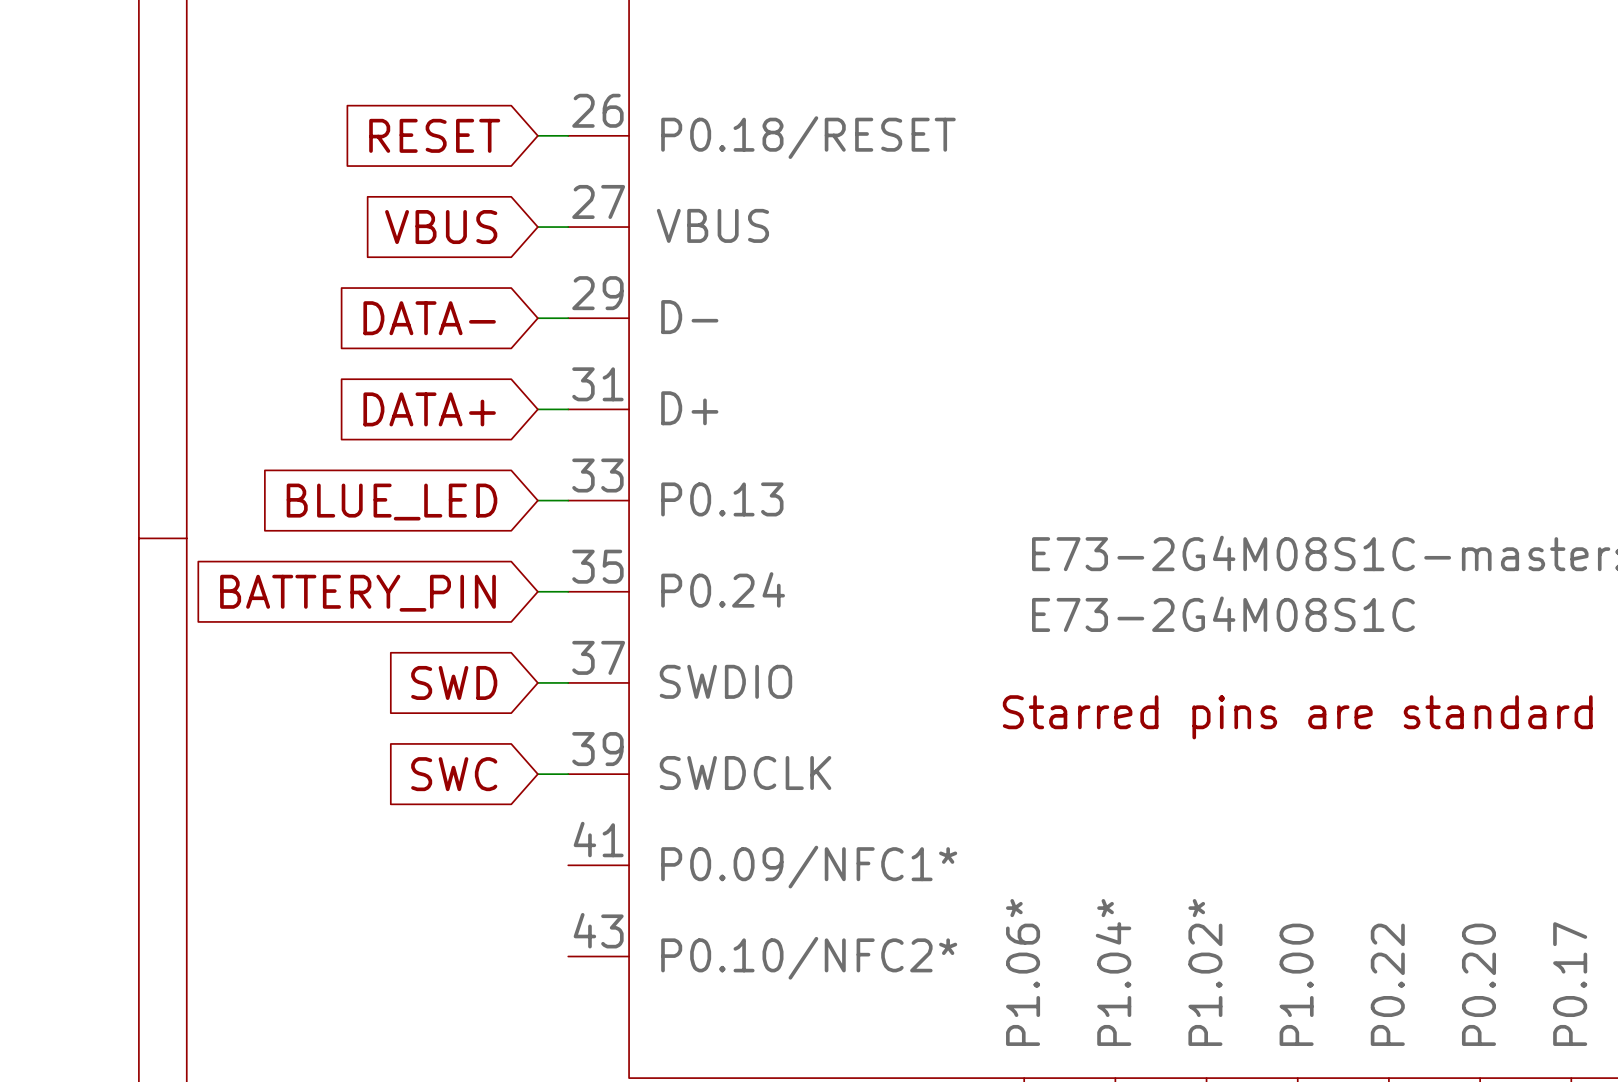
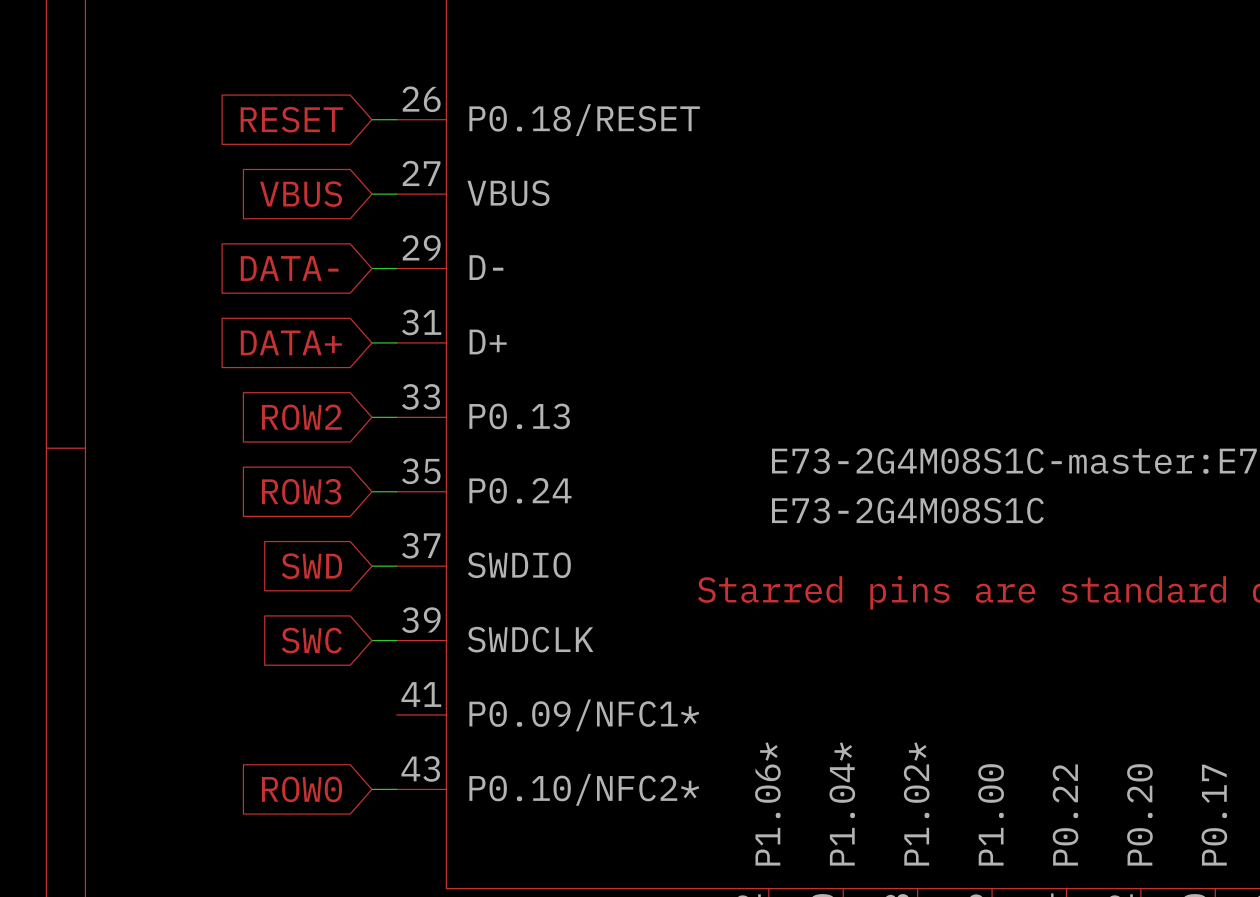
global label: BLUE_LED (391, 502) -> ROW2 (301, 417)
global label: BATTERY_PIN (357, 593) -> ROW3 (301, 491)
global label: none -> ROW0 (302, 789)
wire: none -> (371, 789) (396, 789)

